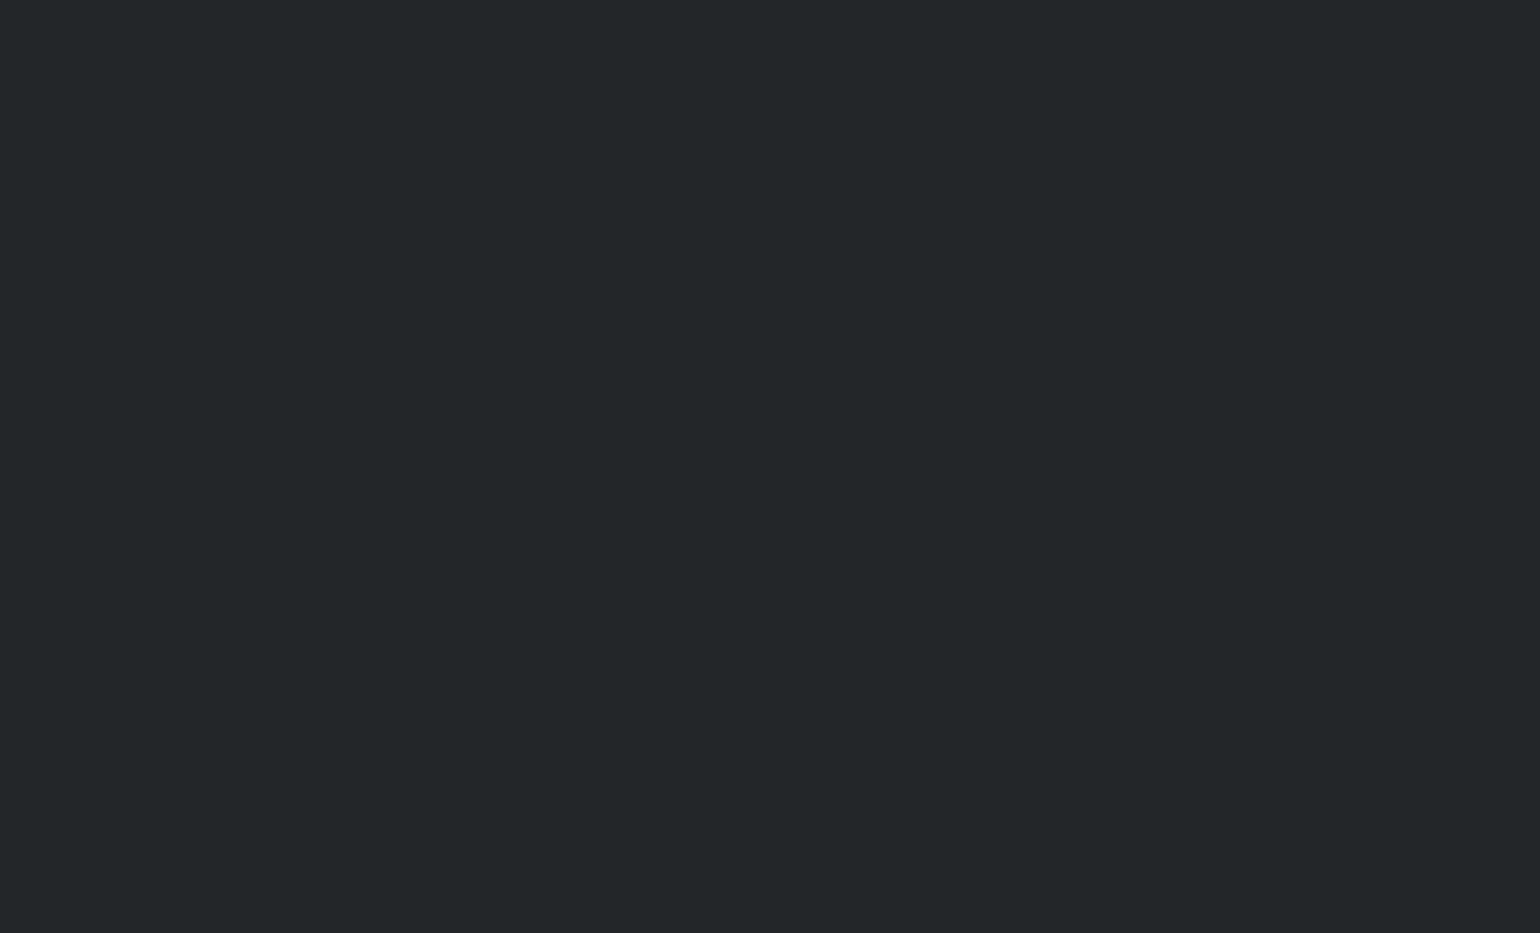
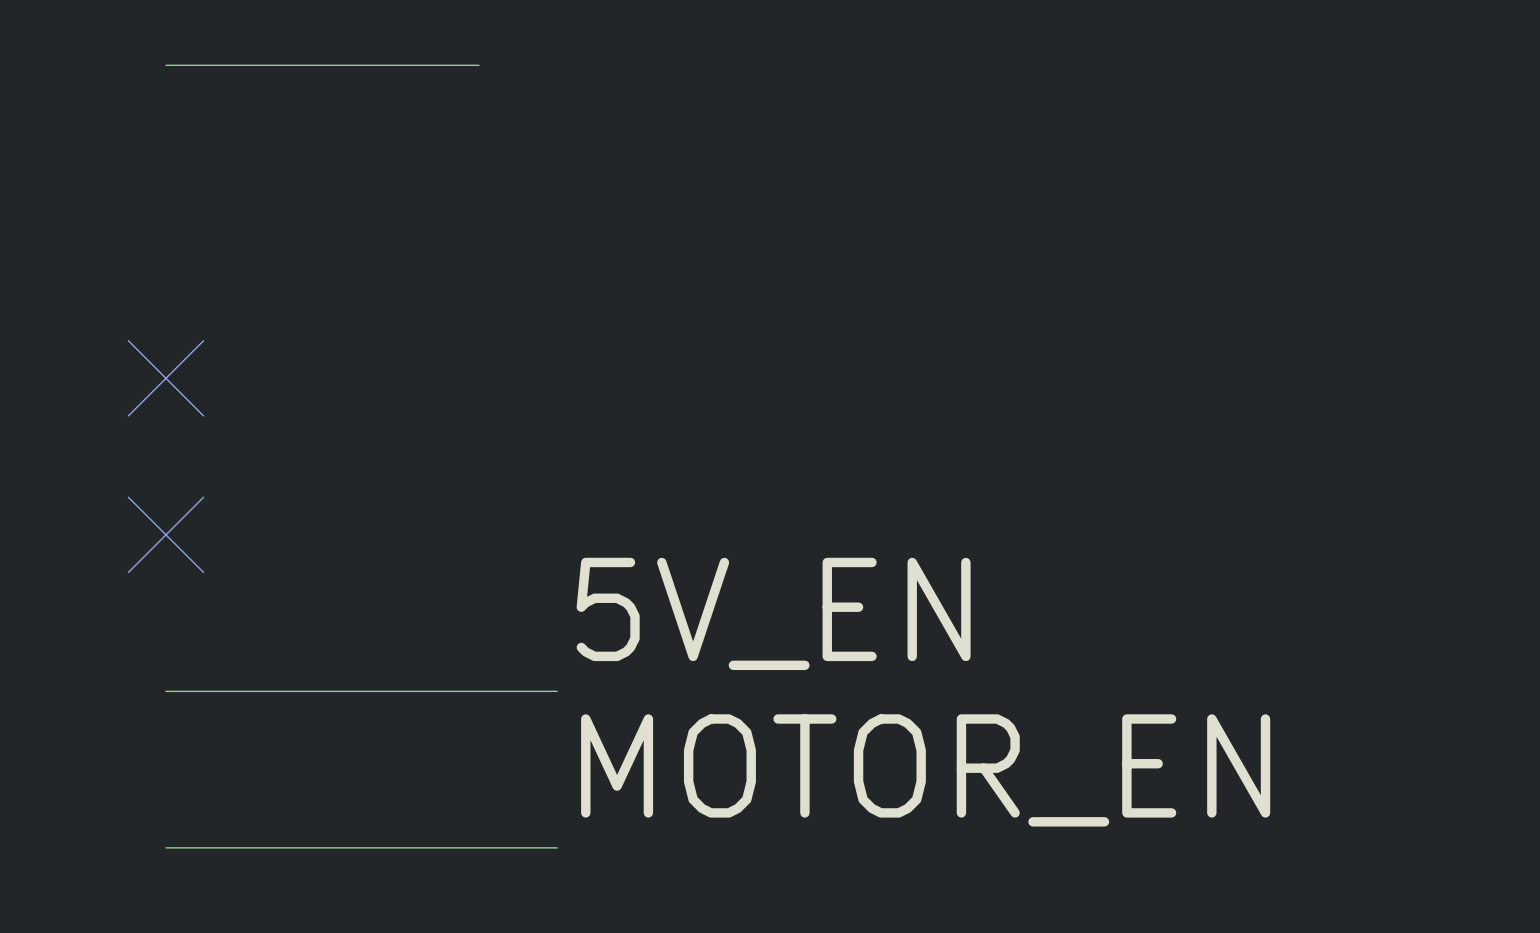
wire: none -> (165, 65) (479, 65)
no-connect mark: none -> (165, 378)
no-connect mark: none -> (165, 534)
label: none -> 5V_EN (773, 613)
wire: none -> (165, 691) (557, 691)
label: none -> MOTOR_EN (925, 770)
wire: none -> (165, 847) (557, 847)

